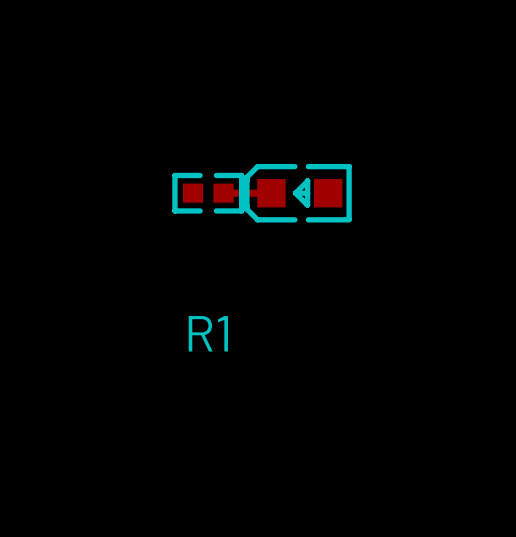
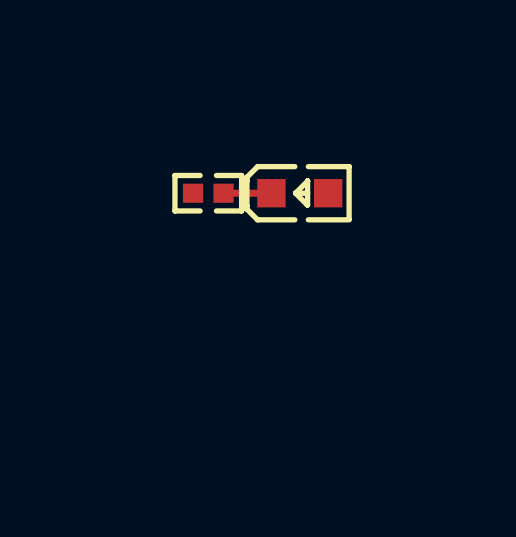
R1 name: R1 (208, 333) -> none

